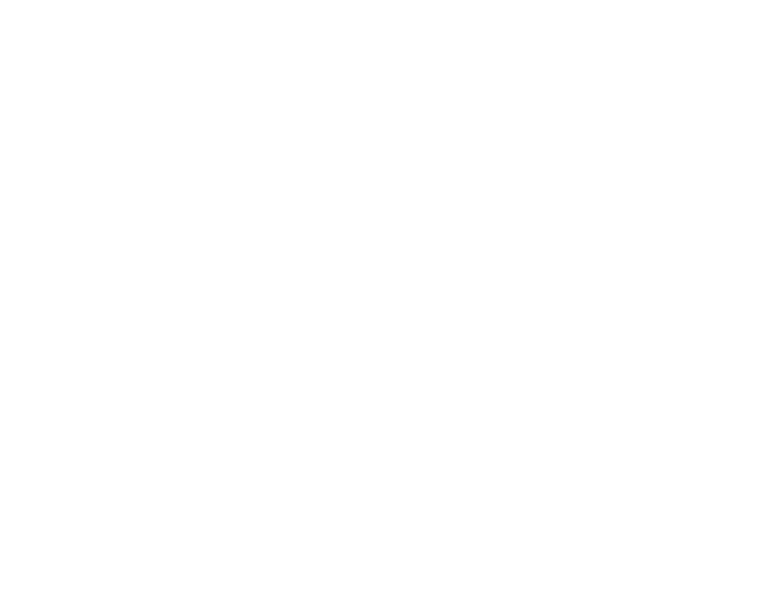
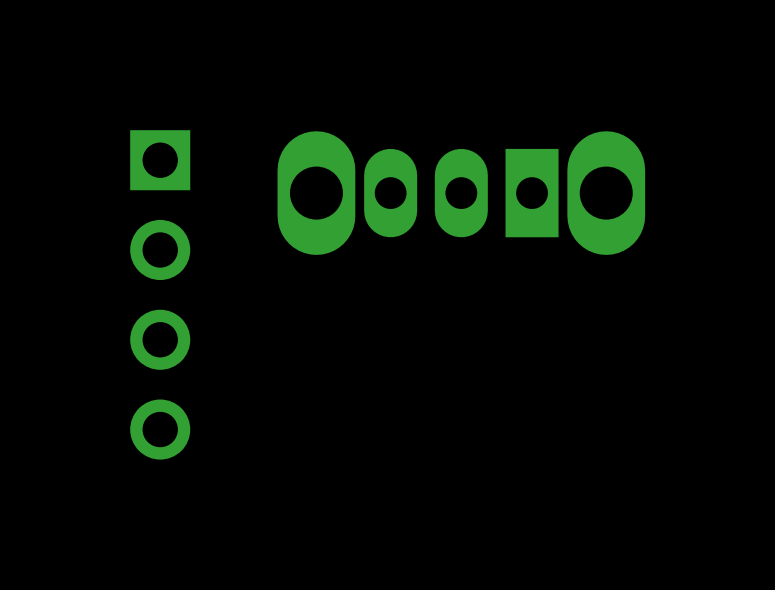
part: none -> (461, 193)
part: none -> (160, 294)

